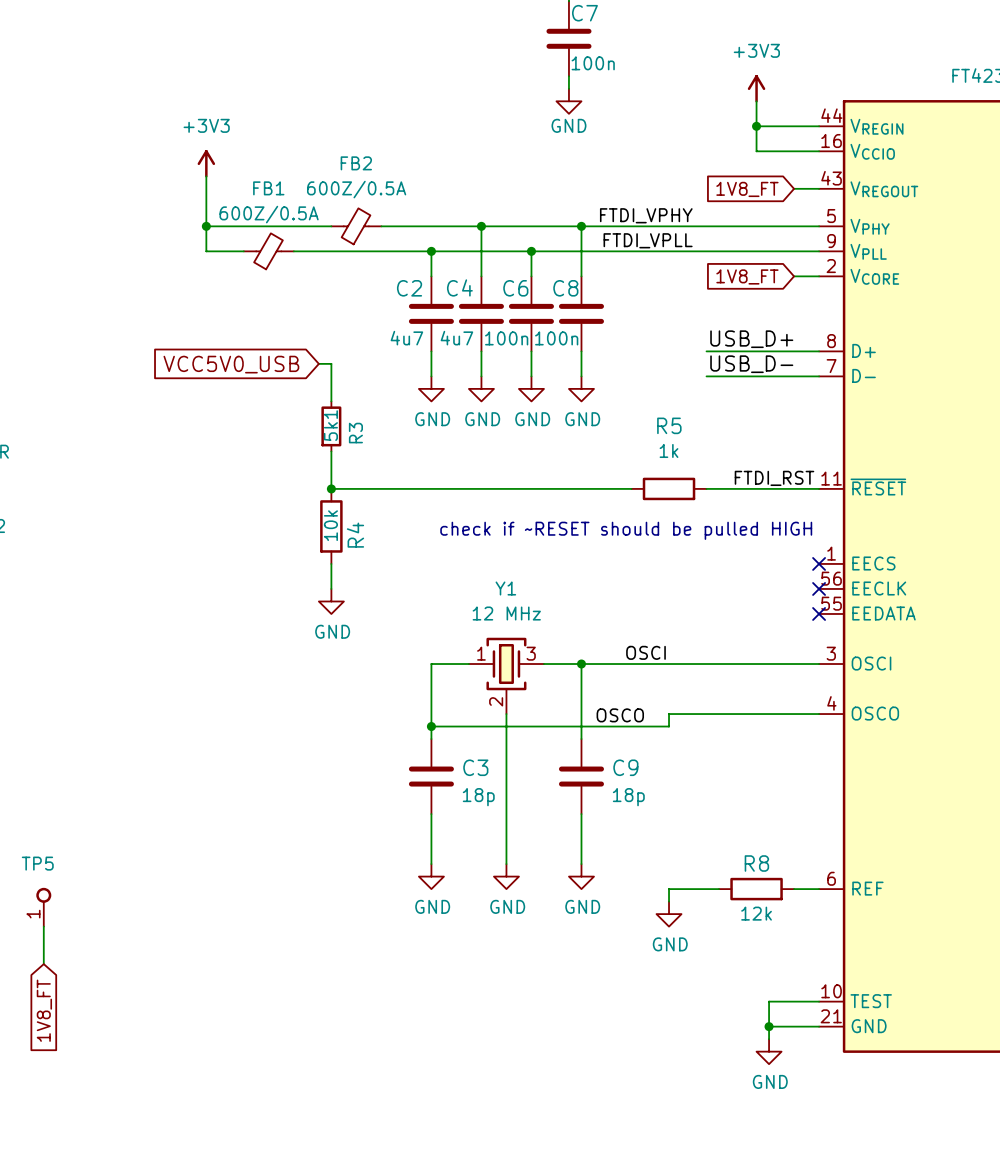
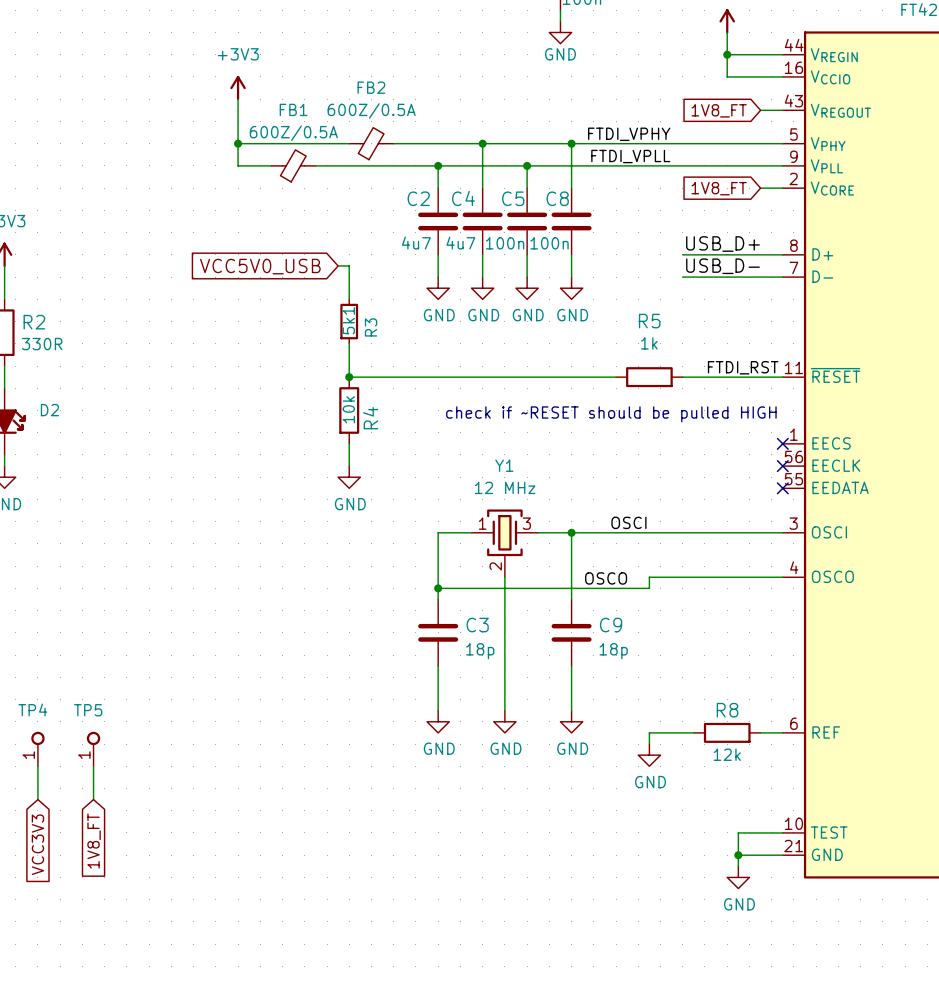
C6 name: C6 (515, 288) -> C5 (513, 198)

